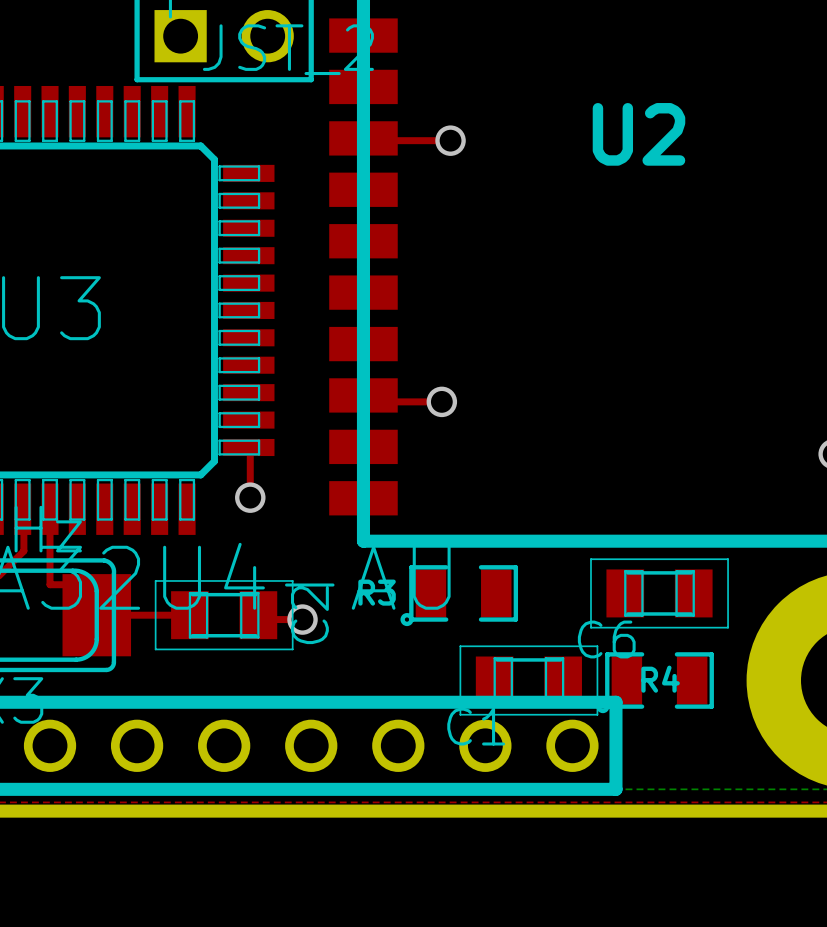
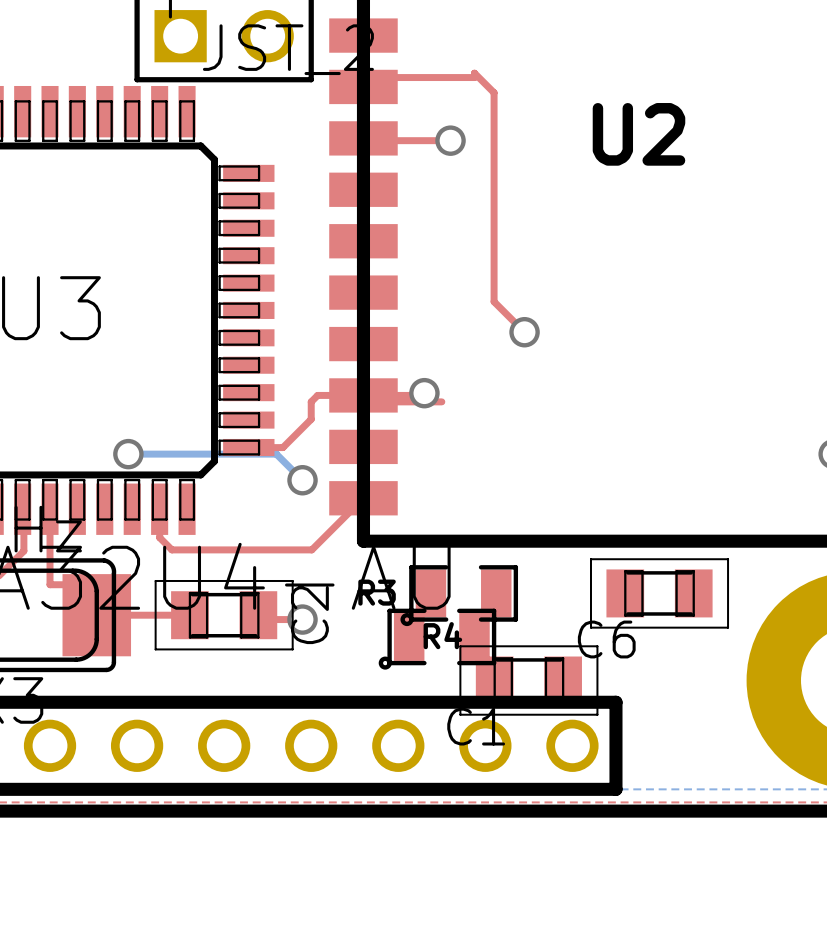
top track: none -> (363, 86) (372, 77) (474, 77) (474, 73) (494, 92) (494, 301) (524, 332)
via: none -> (524, 332)
top track: none -> (424, 393) (422, 395) (317, 395) (311, 401) (311, 419) (282, 447) (245, 447)
via position: (441, 401) -> (424, 393)
top track: (248, 447) (250, 497) -> none
bottom track: none -> (128, 454) (276, 454) (302, 480)
via: none -> (128, 454)
via position: (250, 497) -> (302, 480)
top track: none -> (363, 498) (311, 549) (171, 549) (159, 537) (159, 506)
R4 position: (655, 682) -> (437, 639)

